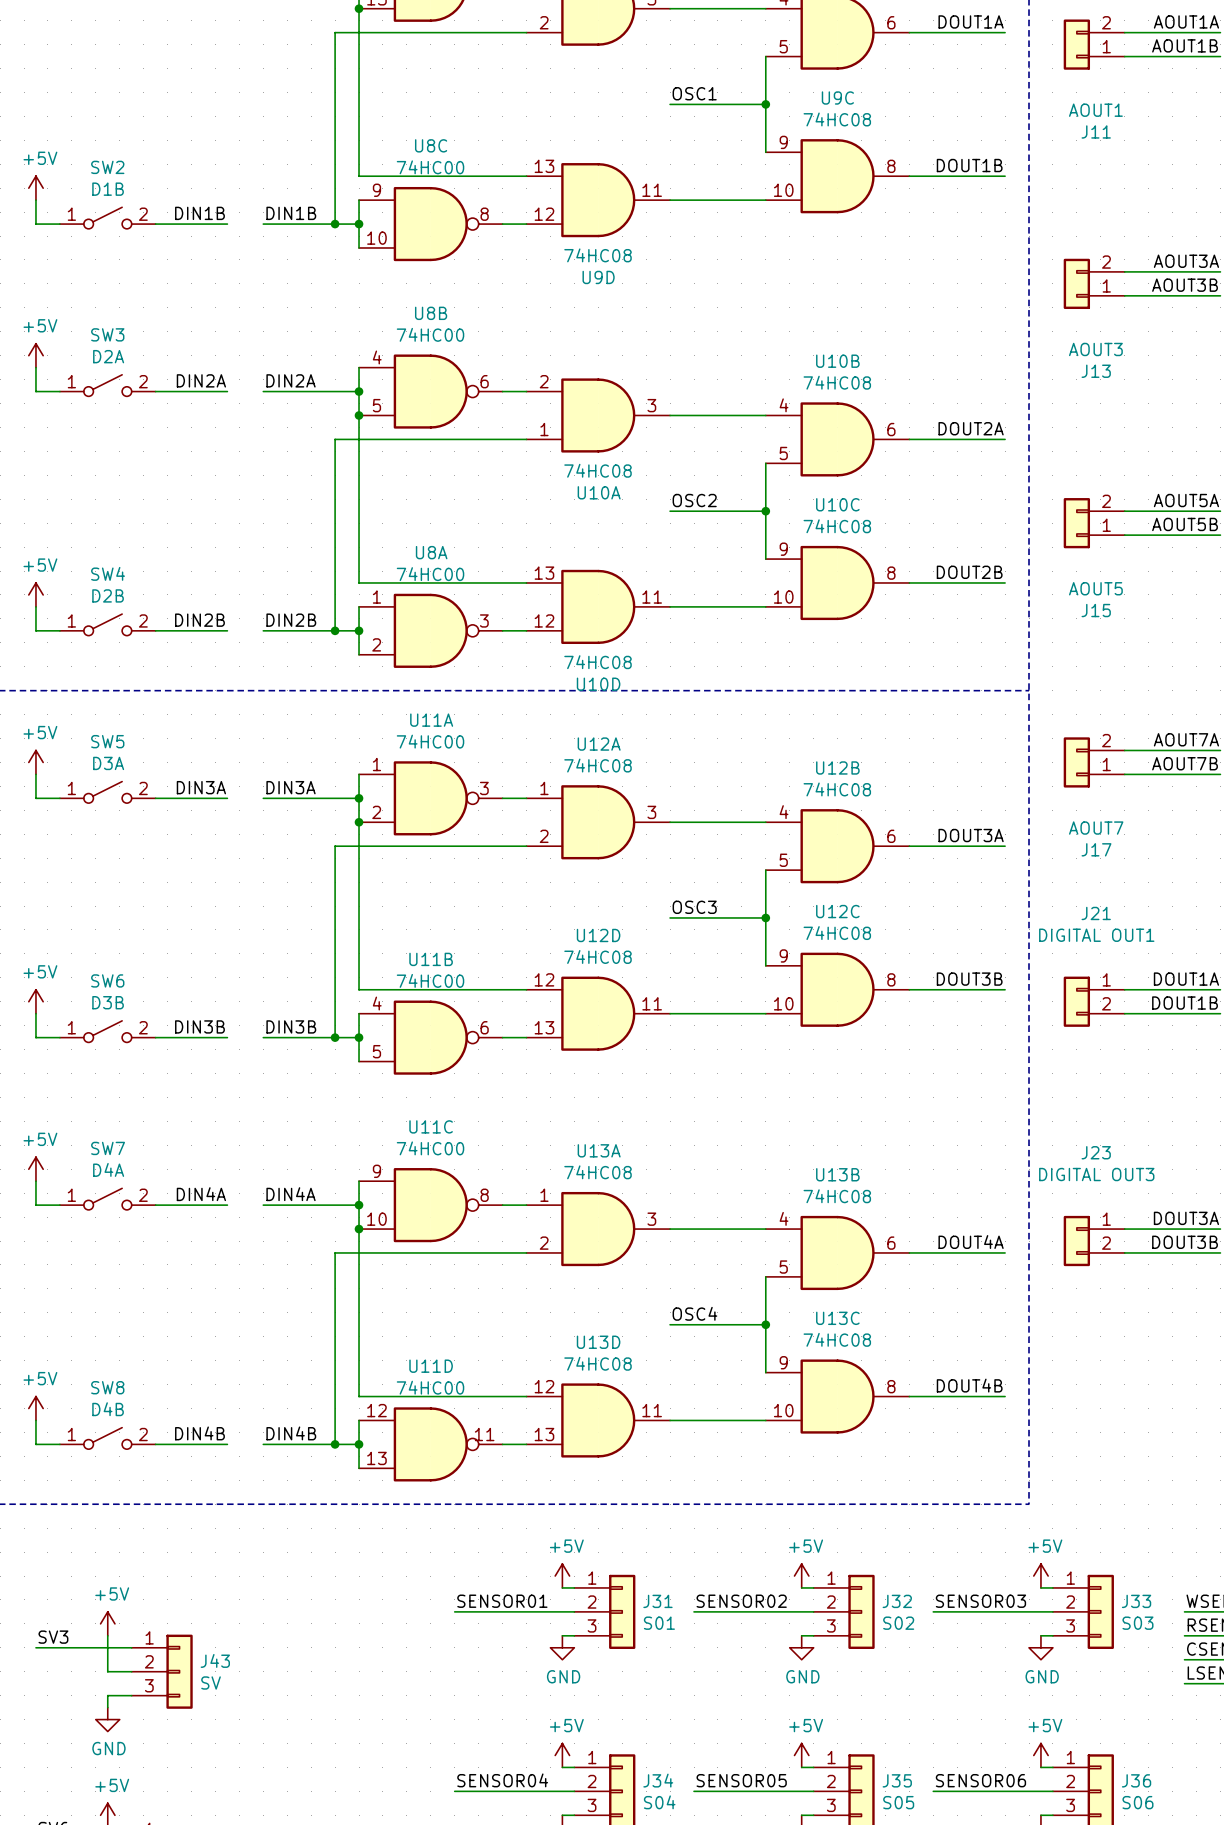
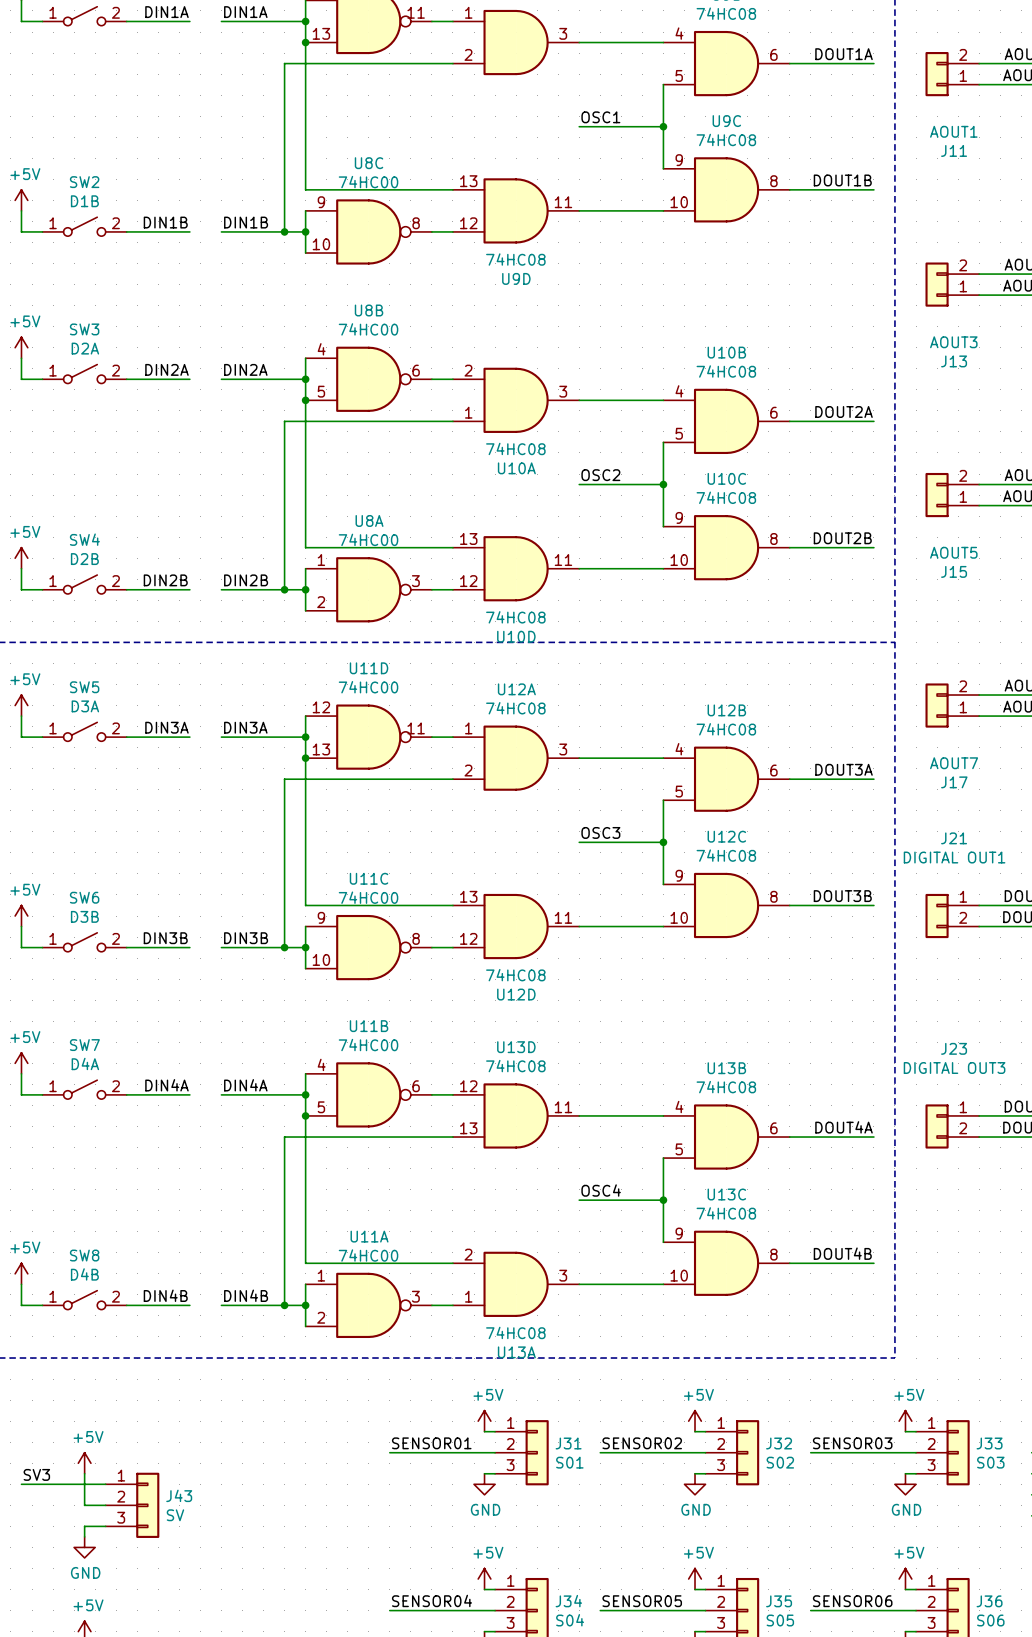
U11A position: (430, 798) -> (368, 1305)
U12D flip: as is (598, 1013) -> up-down (516, 926)
U11B position: (430, 1037) -> (368, 1094)
U11C position: (430, 1205) -> (368, 947)
U13A flip: as is (598, 1229) -> up-down (516, 1284)
U13A position: (598, 1229) -> (516, 1284)
U13D position: (598, 1420) -> (516, 1115)
U11D position: (430, 1444) -> (368, 737)

